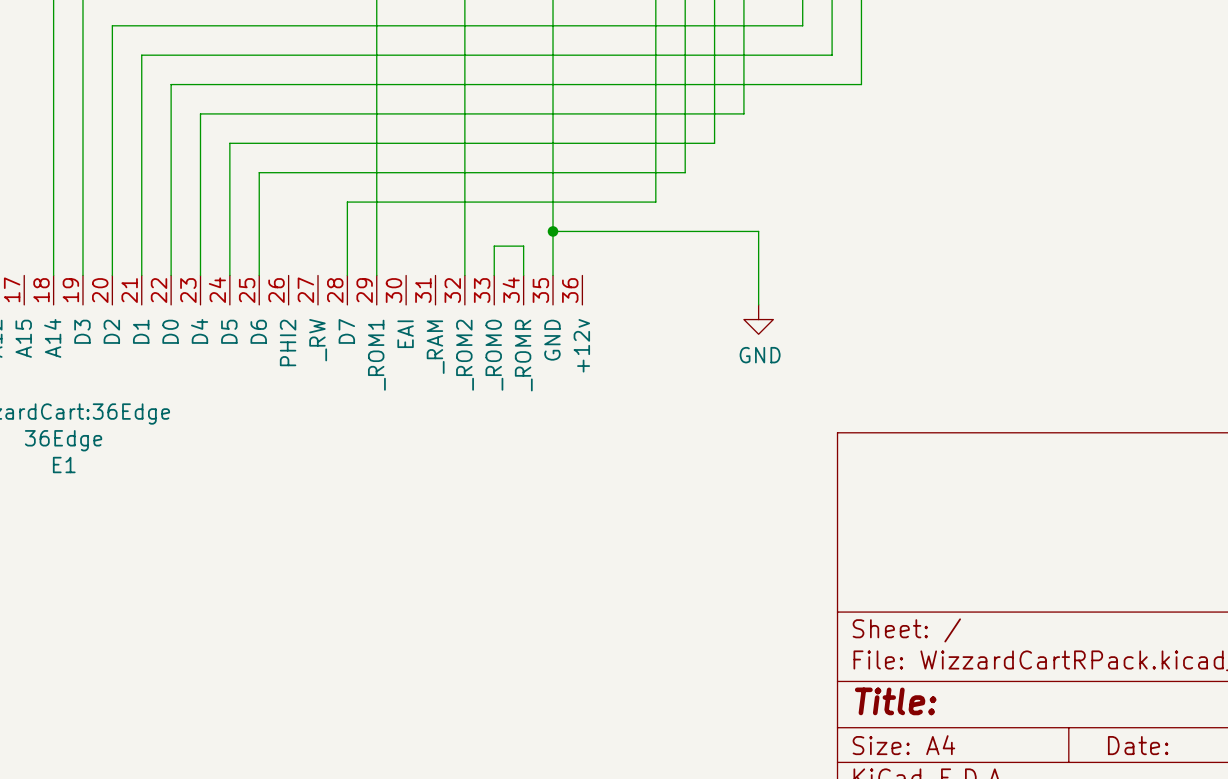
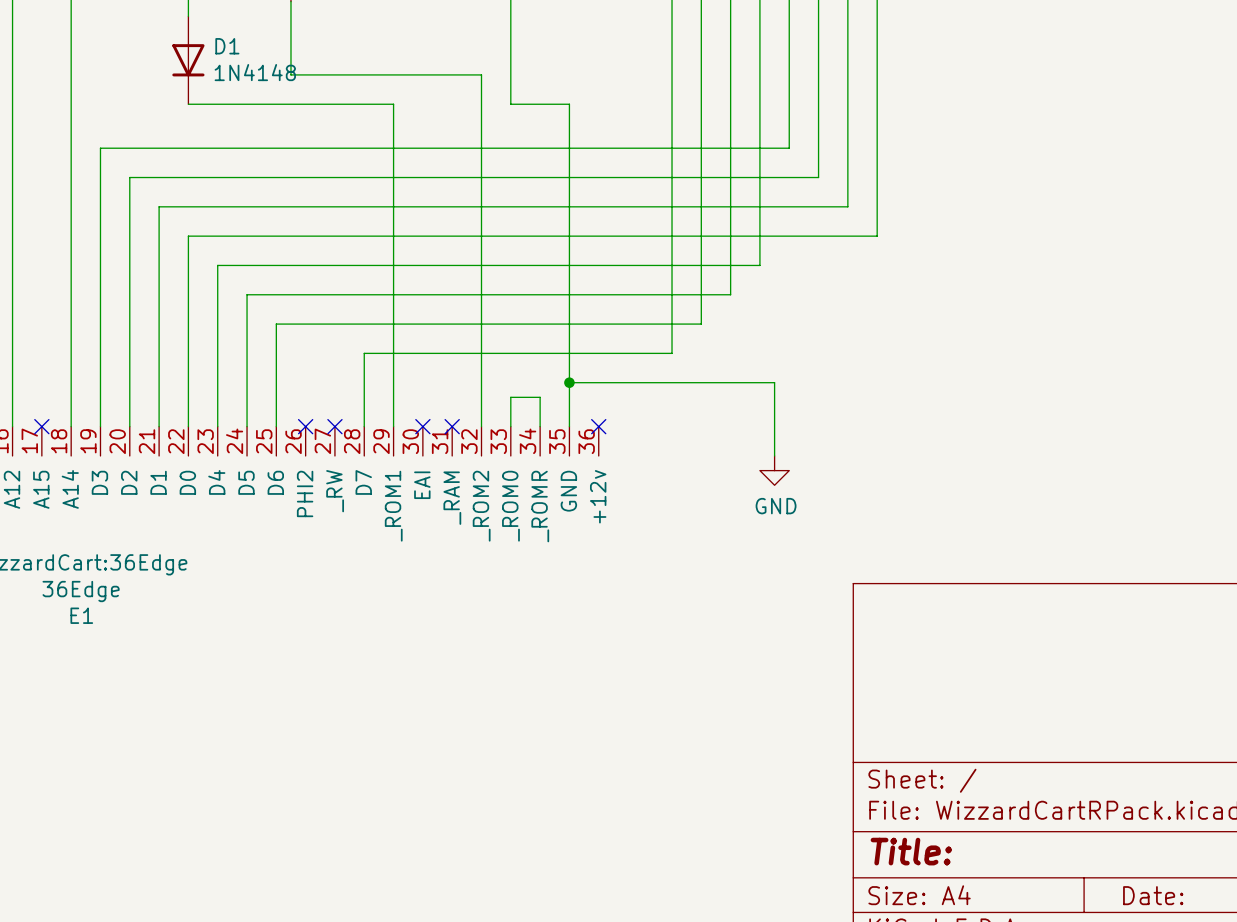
no-connect mark: none -> (41, 426)
no-connect mark: none -> (305, 426)
no-connect mark: none -> (334, 426)
no-connect mark: none -> (422, 426)
no-connect mark: none -> (452, 426)
no-connect mark: none -> (598, 426)

